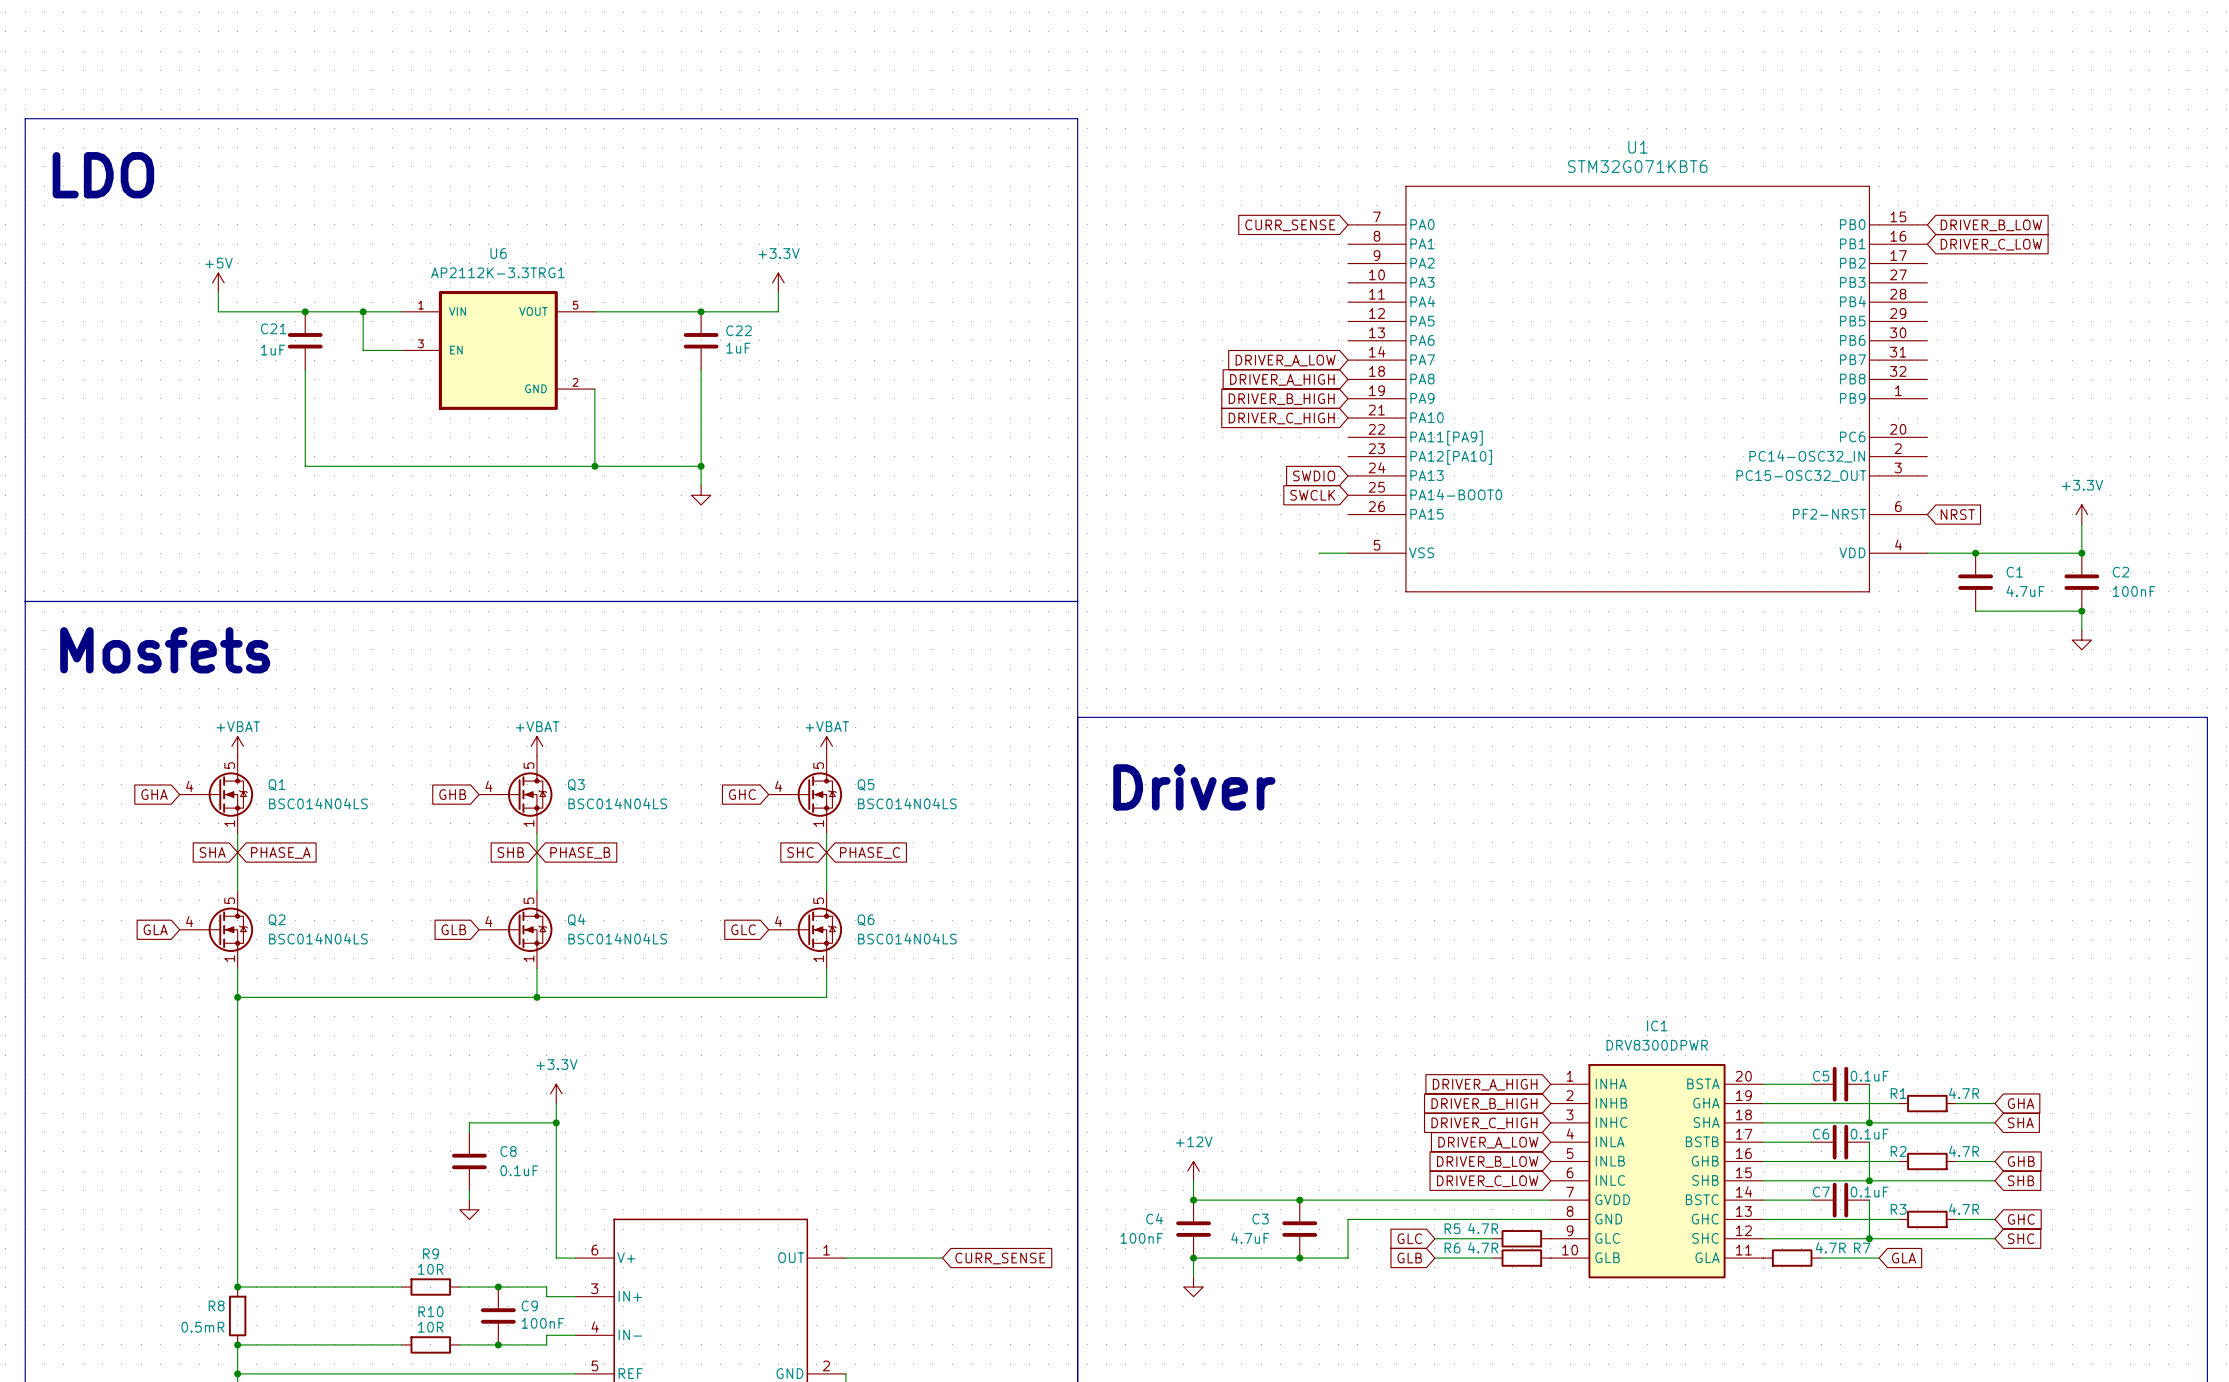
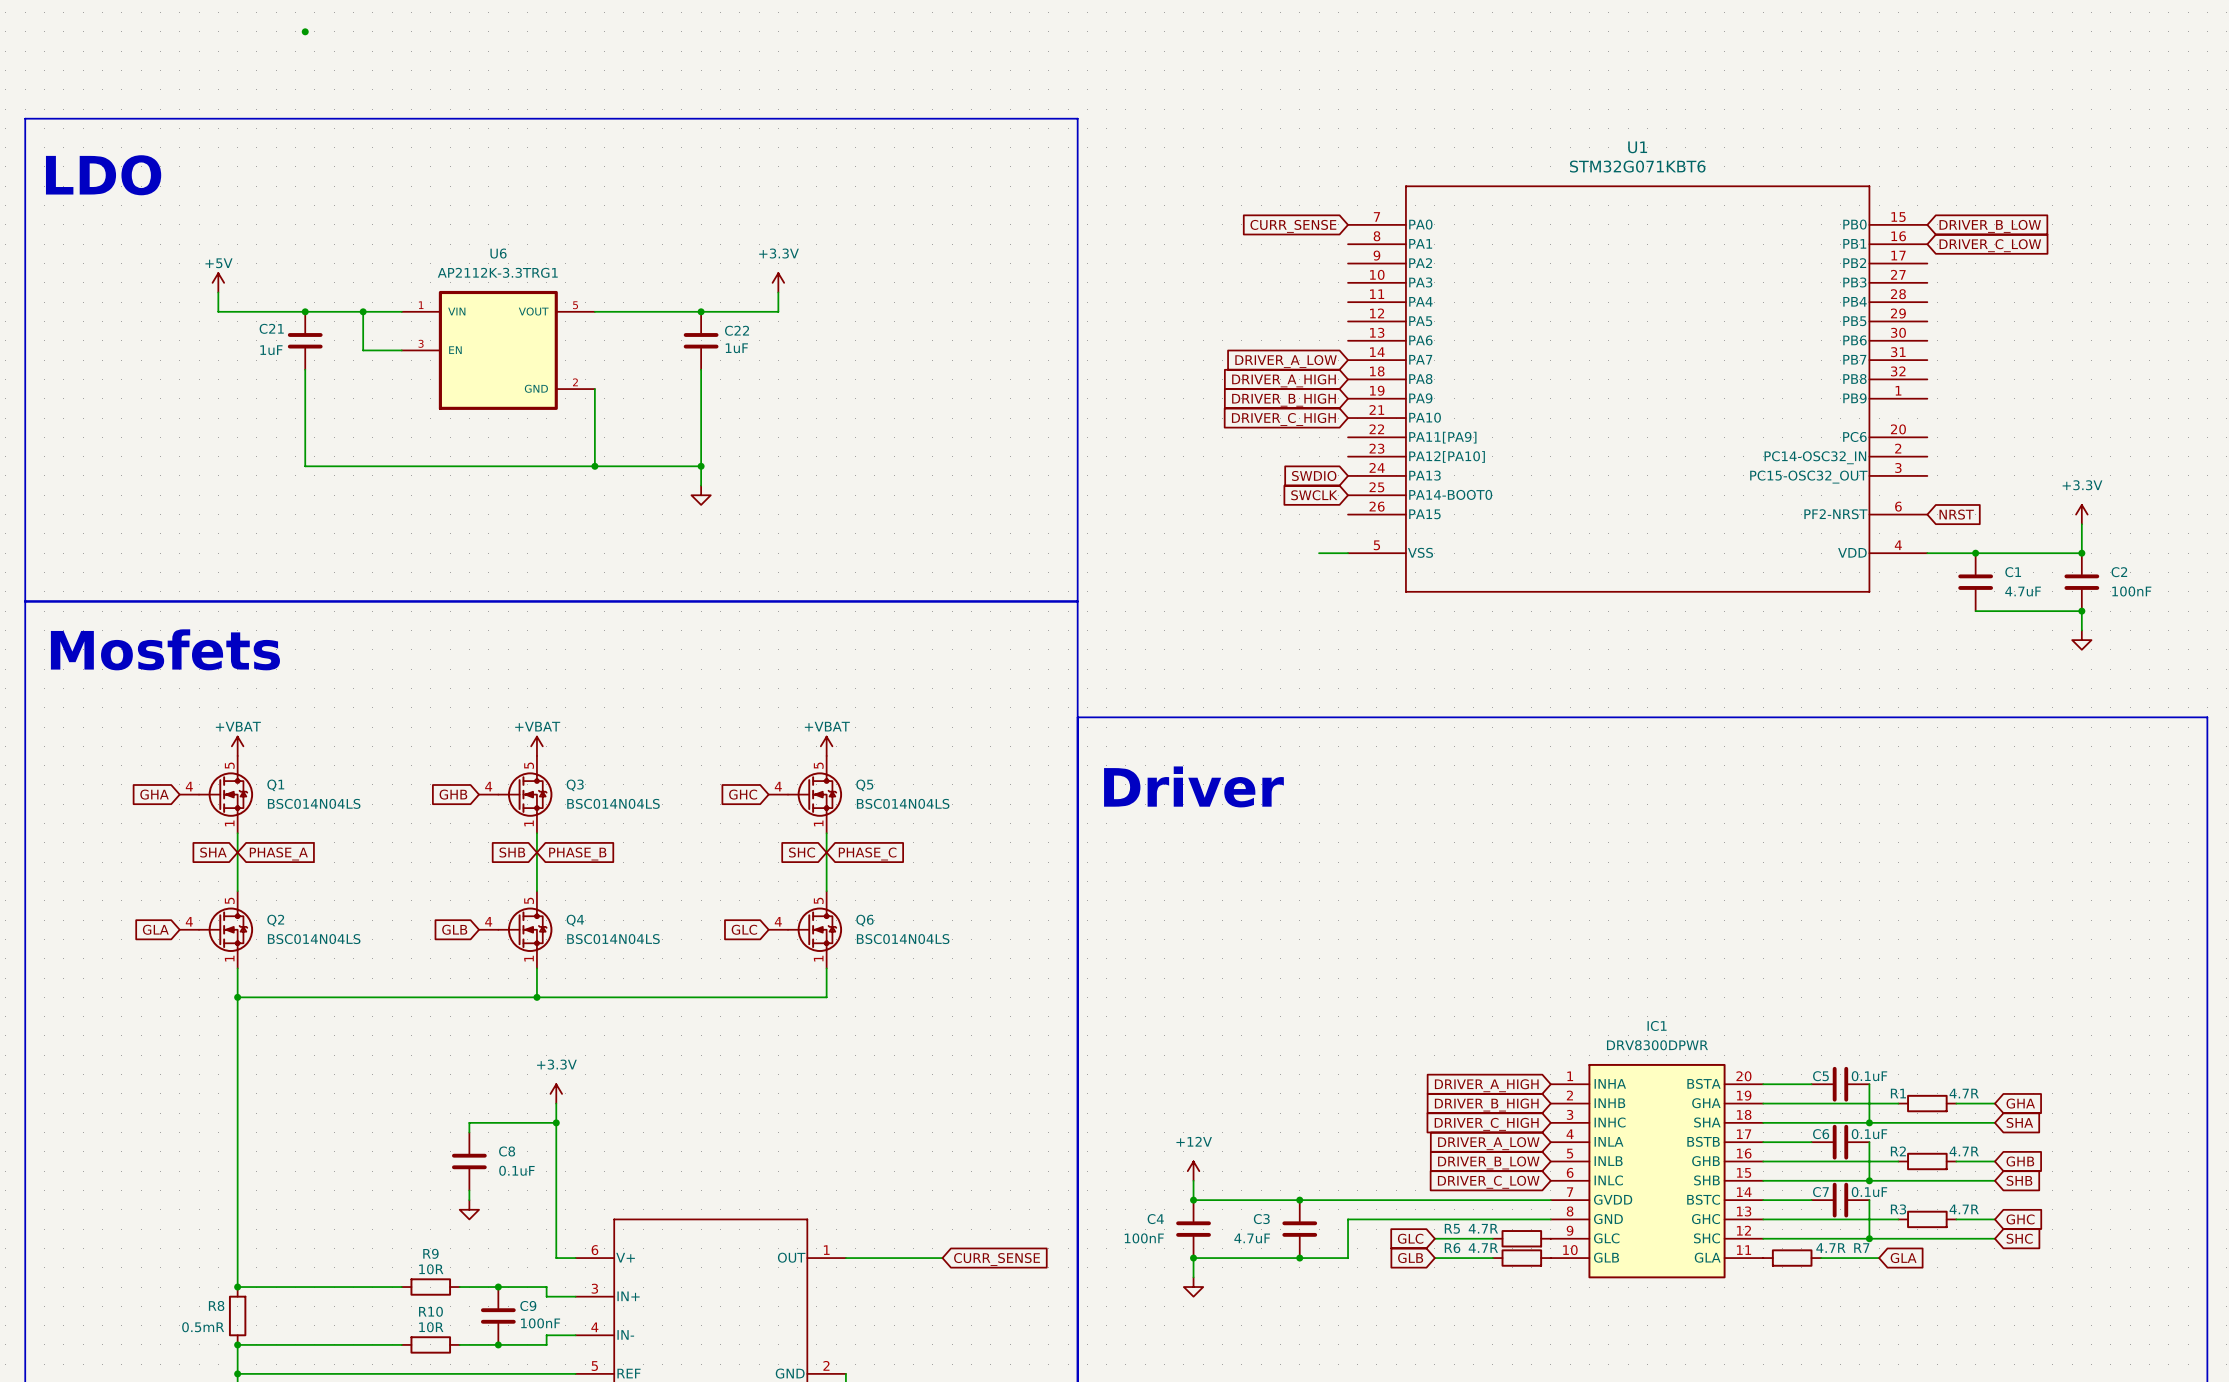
junction: none -> (305, 31)

